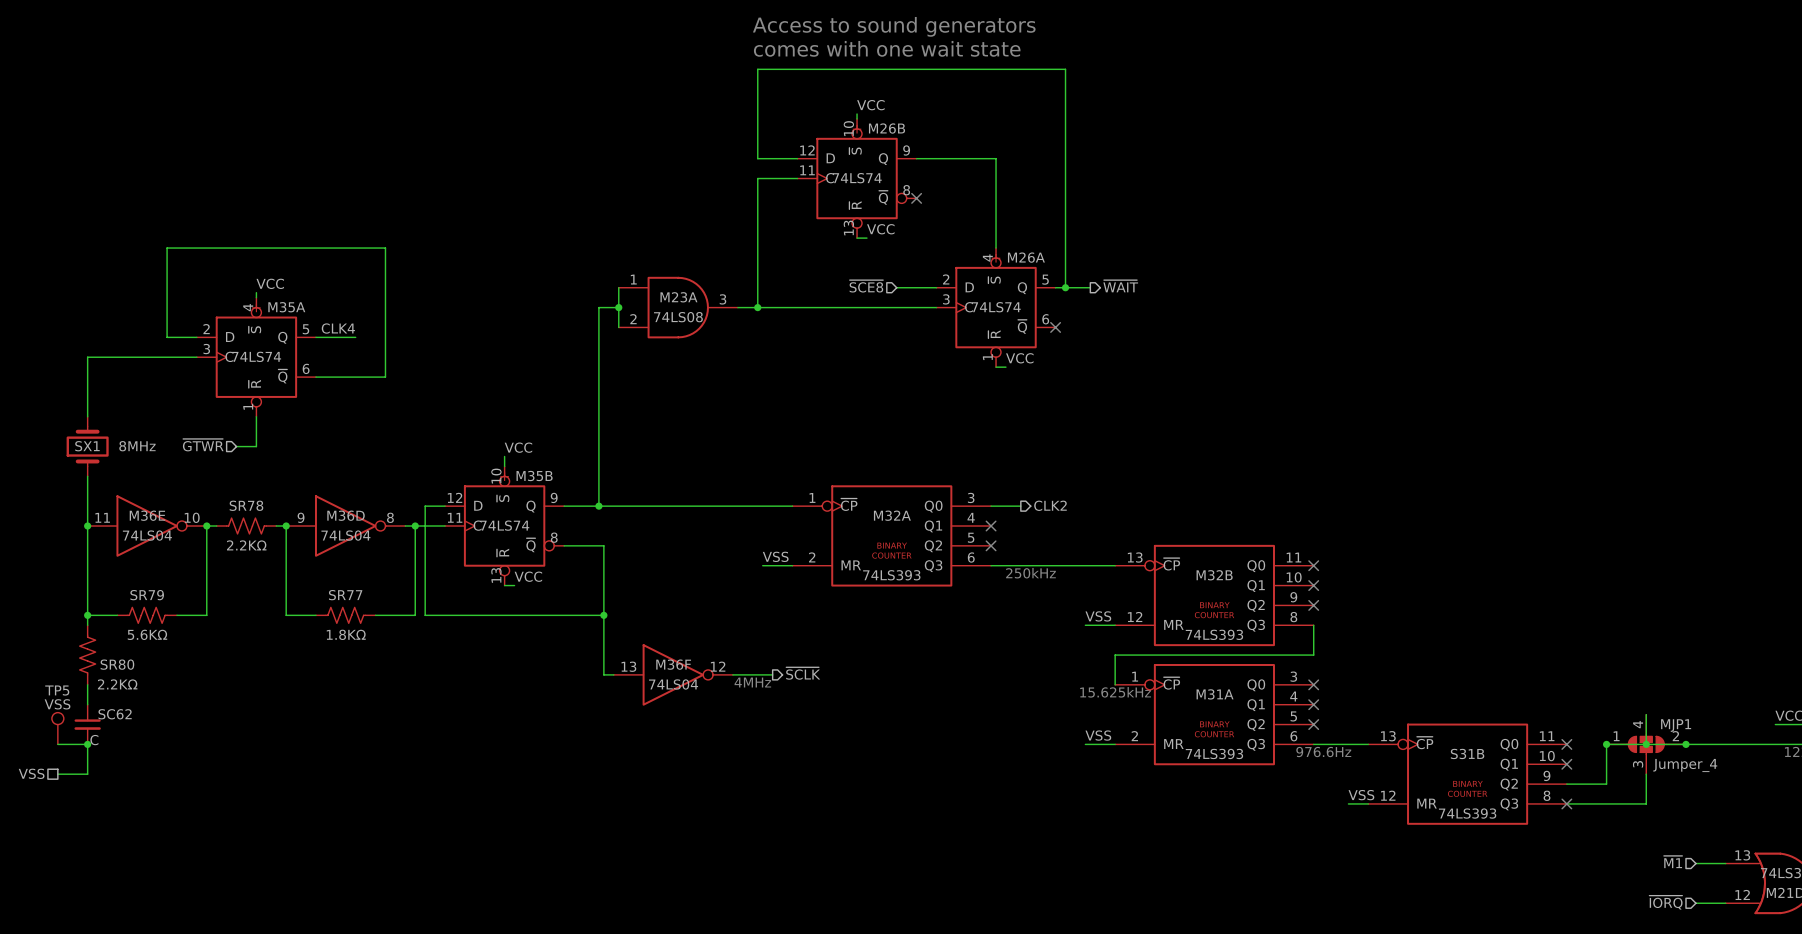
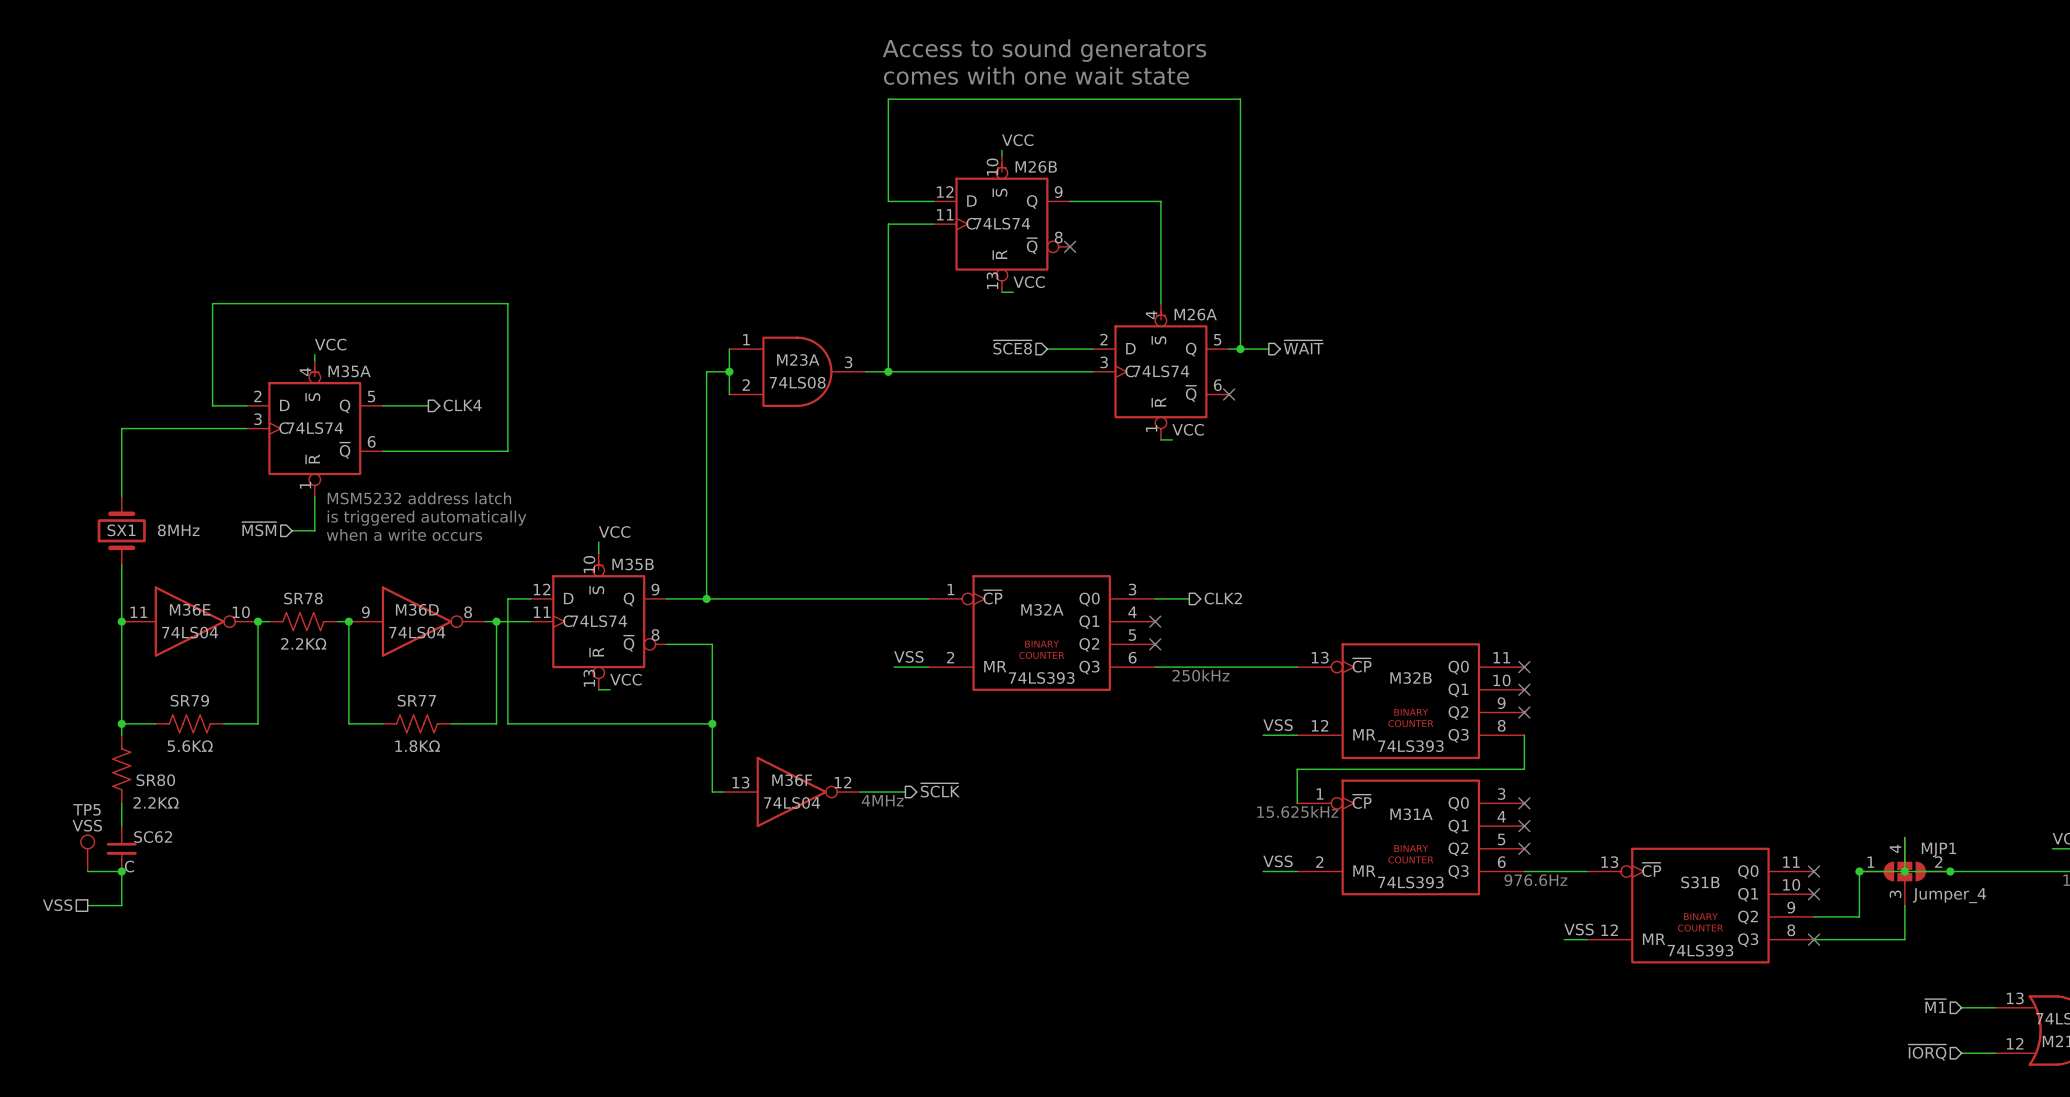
wire: (385, 248) (385, 377) -> (462, 303) (507, 303) (507, 451) (462, 451)
label: CLK4 (338, 328) -> none
hierarchical label: none -> CLK4 (462, 405)
text: none -> MSM5232 address latch (419, 498)
text: none -> is triggered automatically (426, 518)
hierarchical label: ~{GTWR} (203, 445) -> ~{MSM} (259, 529)
text: none -> when a write occurs (404, 534)

